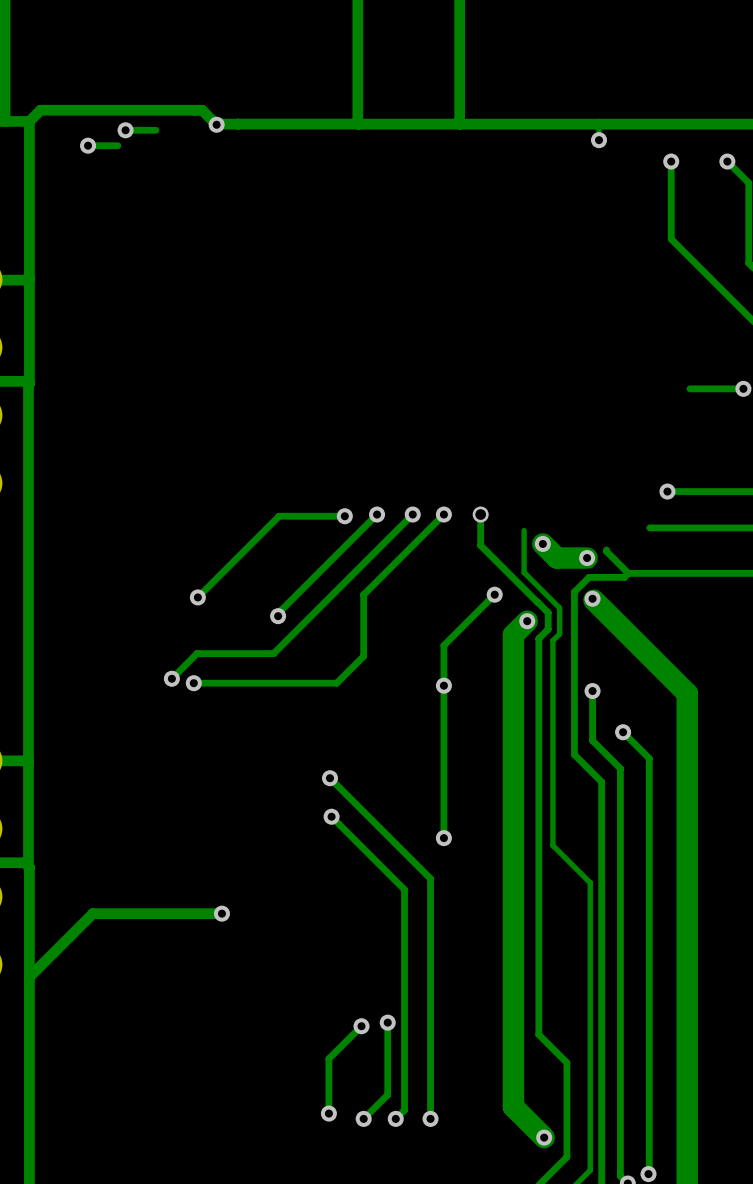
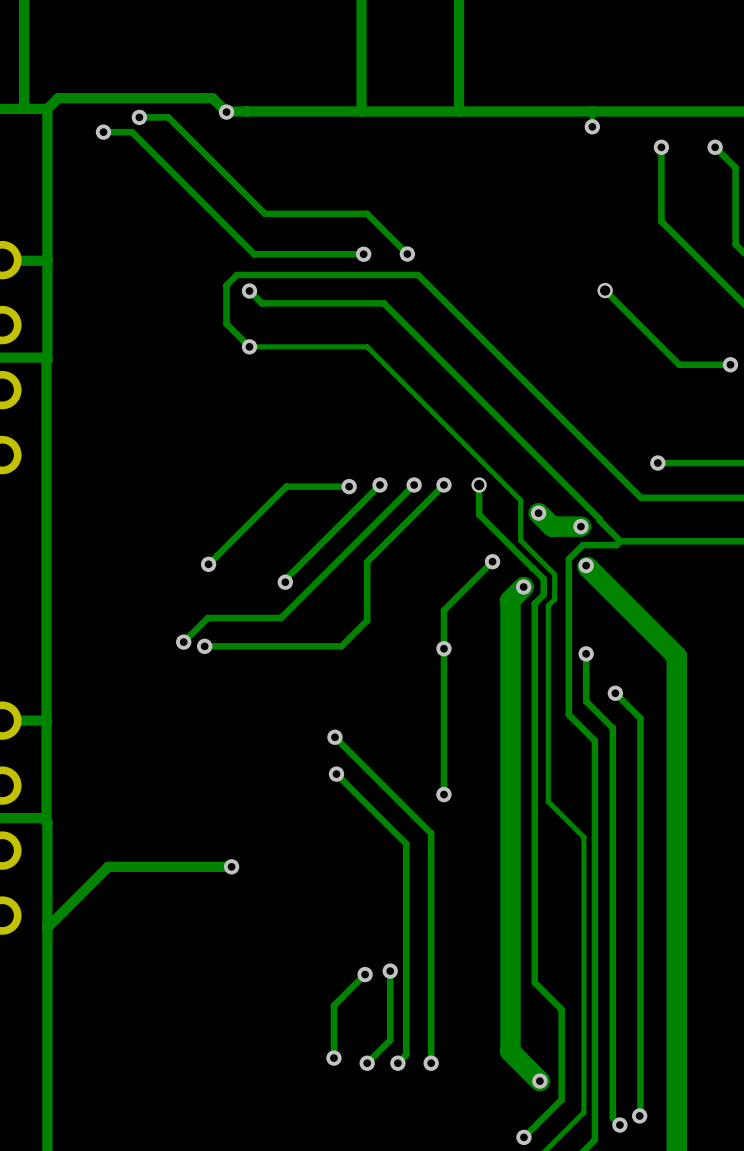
track: none -> (168, 117) (264, 213) (367, 213) (407, 254)
track: none -> (132, 132) (254, 254) (363, 254)
via: none -> (363, 254)
via: none -> (407, 254)
track: none -> (249, 291) (261, 303) (383, 303) (599, 518)
via: none -> (249, 291)
track: none -> (605, 290) (679, 364)
via: none -> (605, 290)
via: none -> (249, 346)
track: none -> (640, 497) (418, 274) (236, 274) (226, 285) (226, 323) (249, 346) (367, 346) (520, 500)

